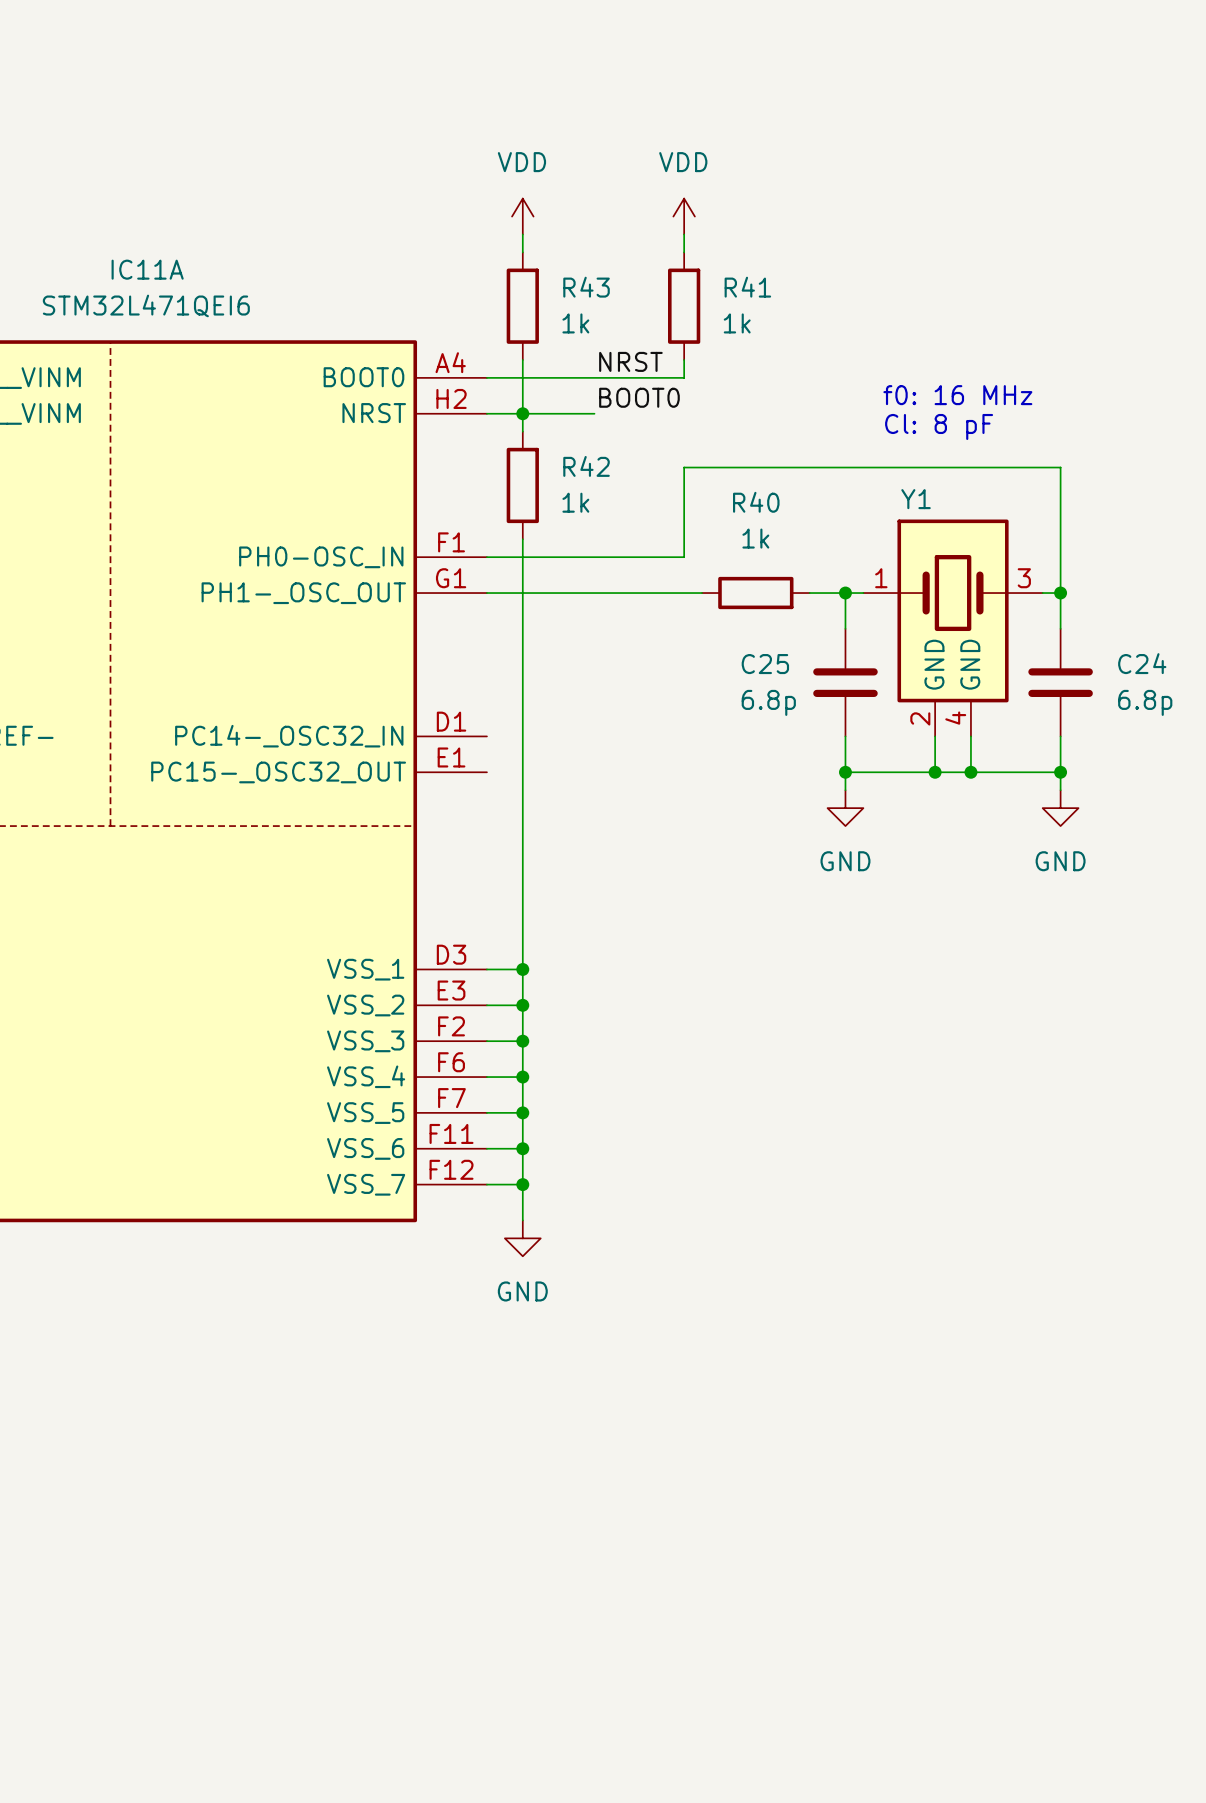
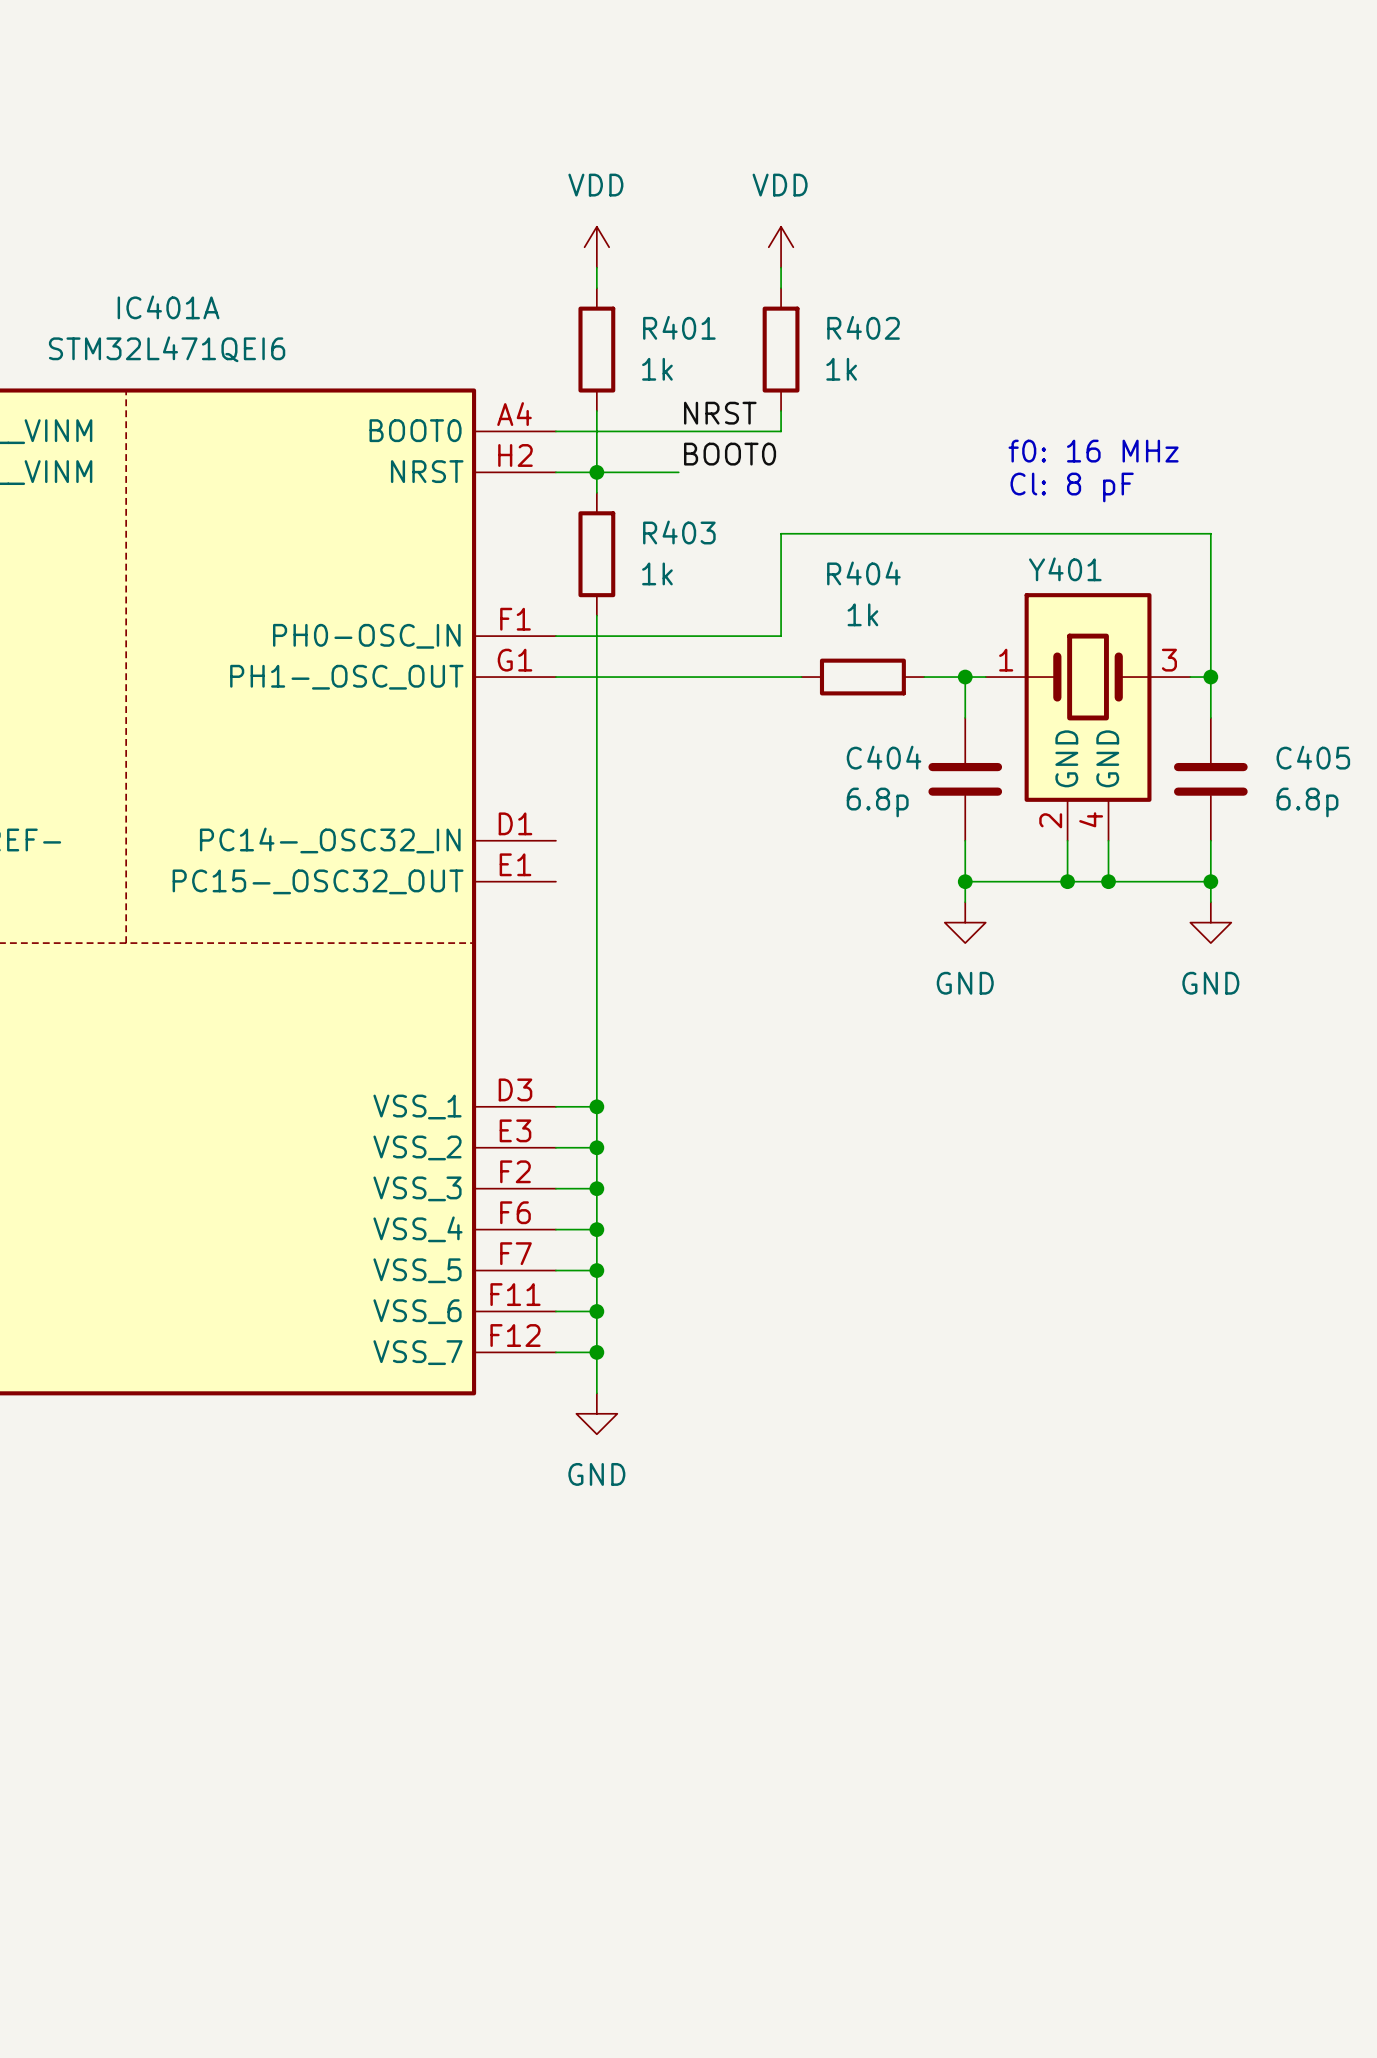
IC11A name: IC11A (147, 269) -> IC401A (168, 307)
R43 name: R43 (586, 287) -> R401 (679, 327)
R41 name: R41 (747, 287) -> R402 (863, 327)
R42 name: R42 (586, 466) -> R403 (679, 532)
Y1 name: Y1 (916, 499) -> Y401 (1065, 569)
R40 name: R40 (756, 502) -> R404 (863, 573)
C24 name: C24 (1142, 663) -> C405 (1313, 757)
C25 name: C25 (765, 664) -> C404 (884, 757)

